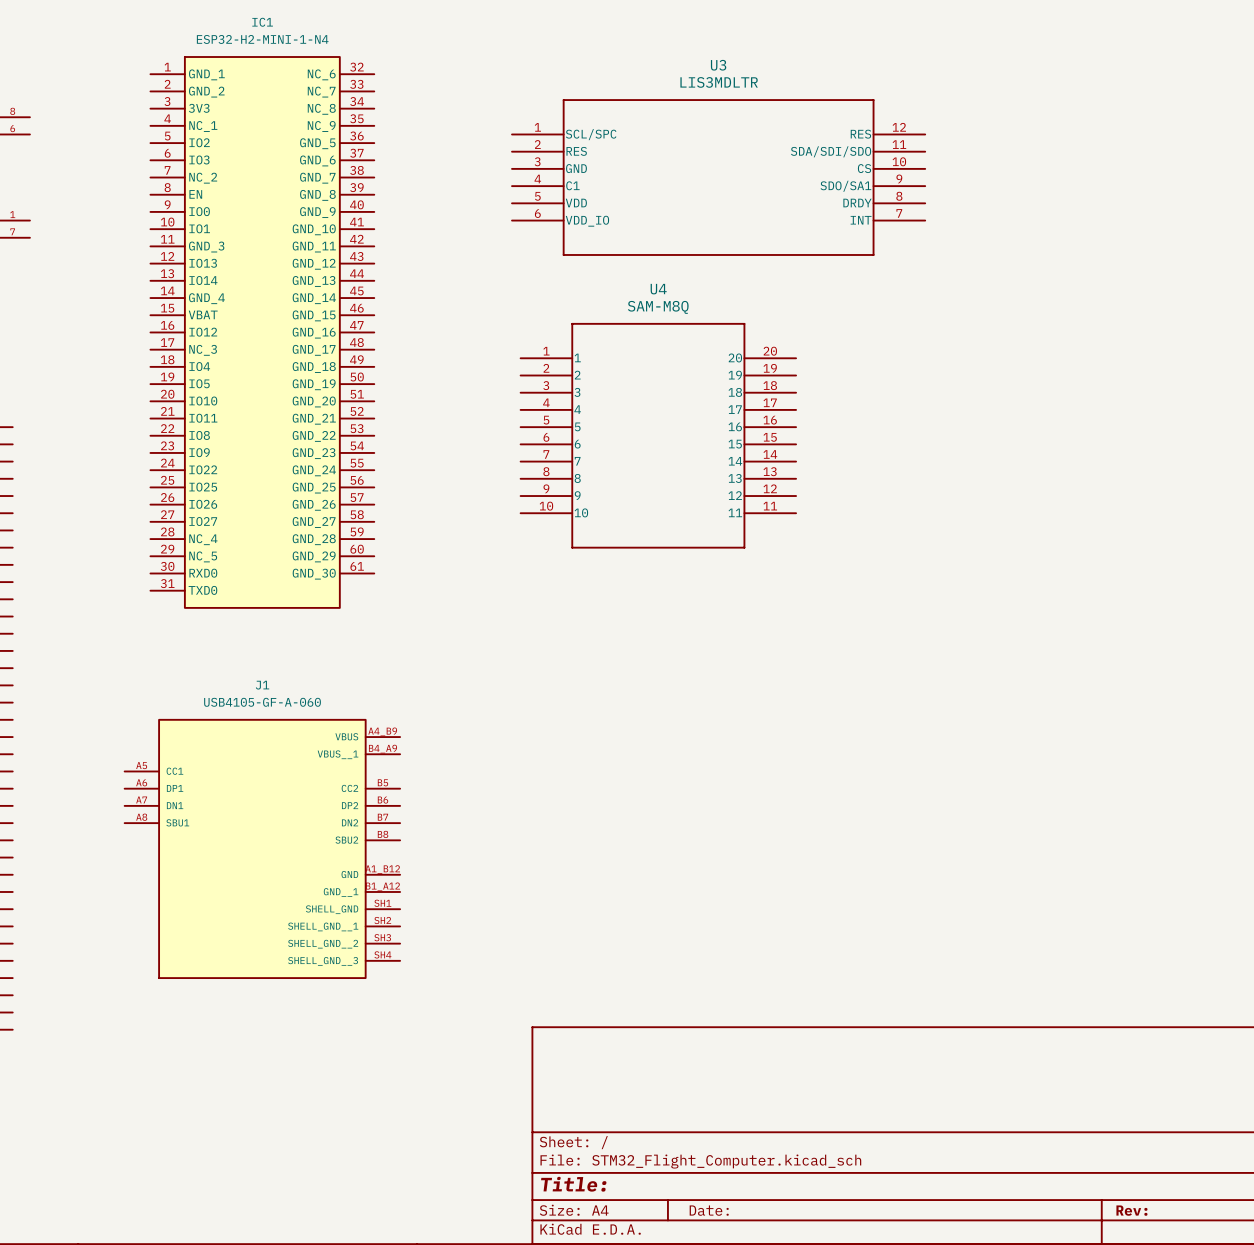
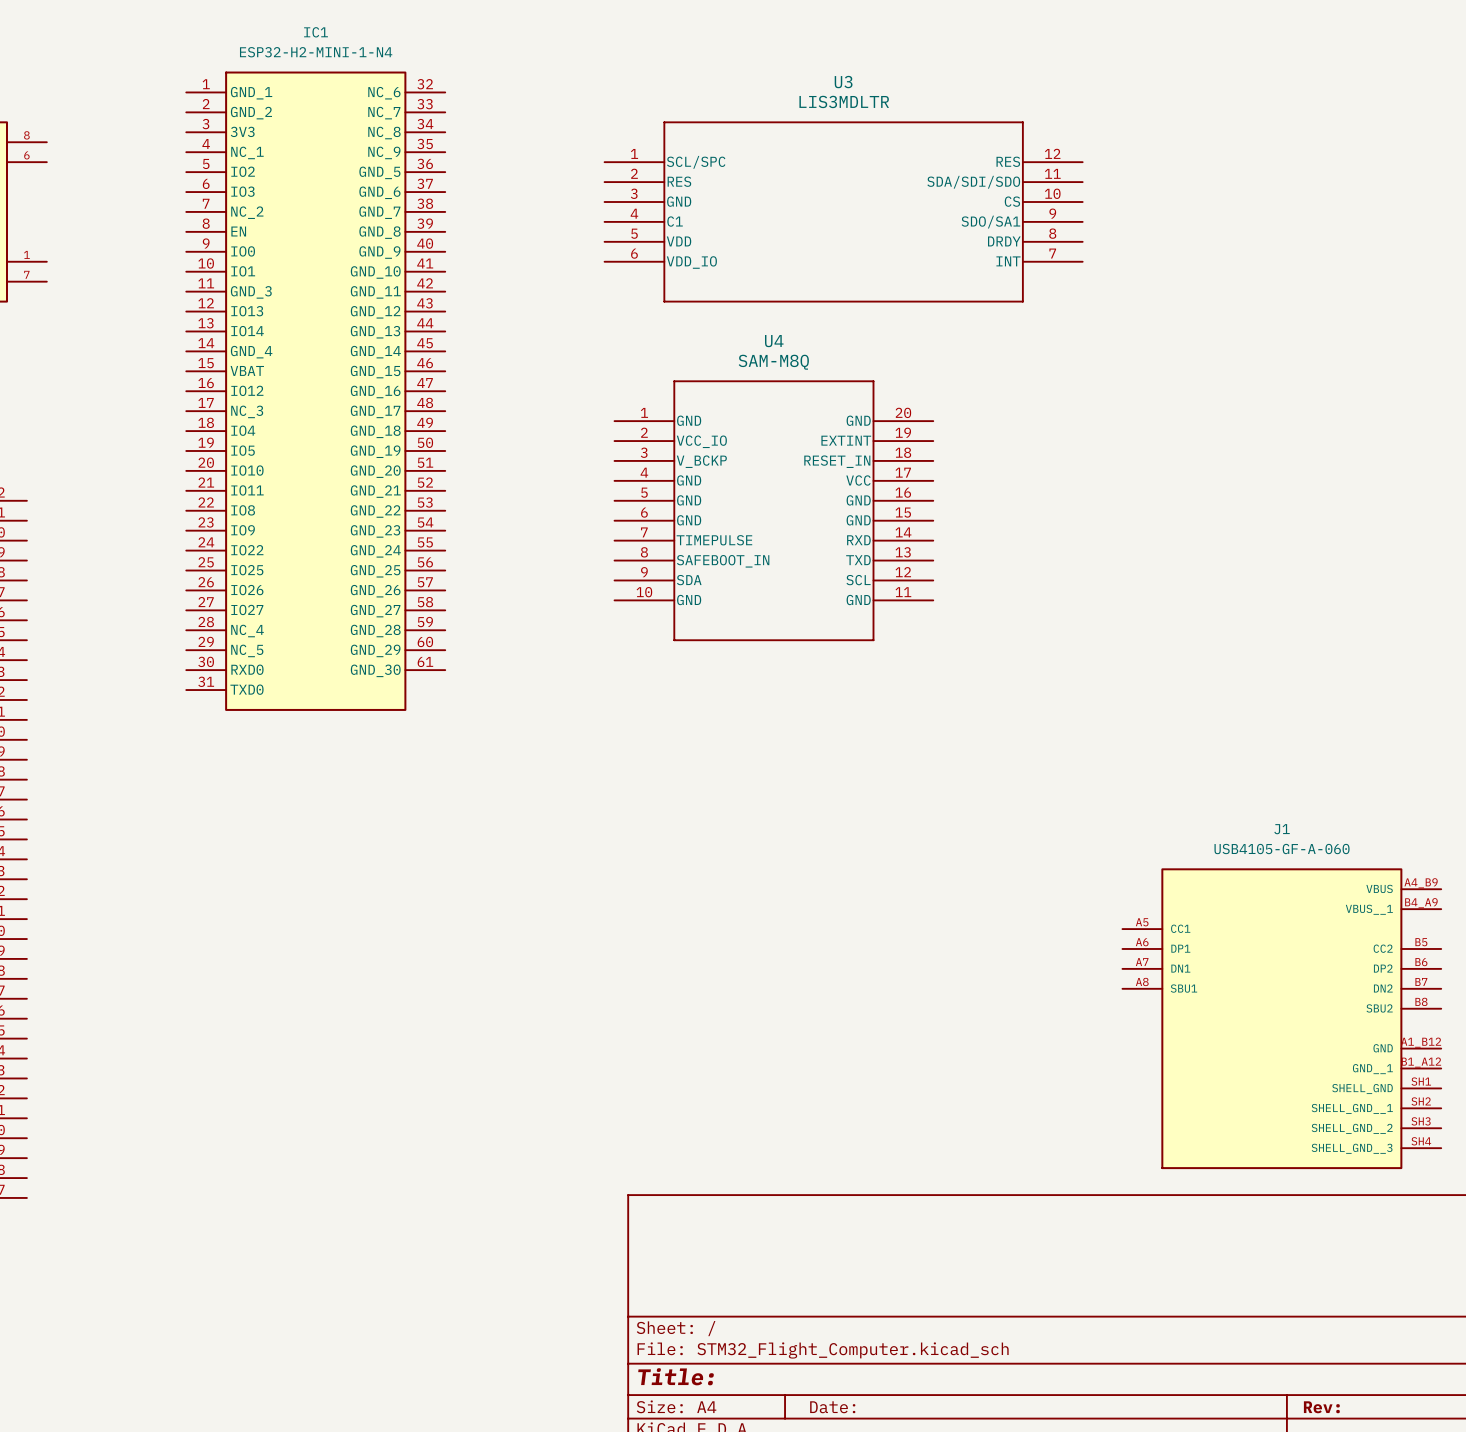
U4 symbol: [520, 323, 797, 549] -> [614, 380, 934, 641]
J1 position: (262, 848) -> (1281, 1018)

